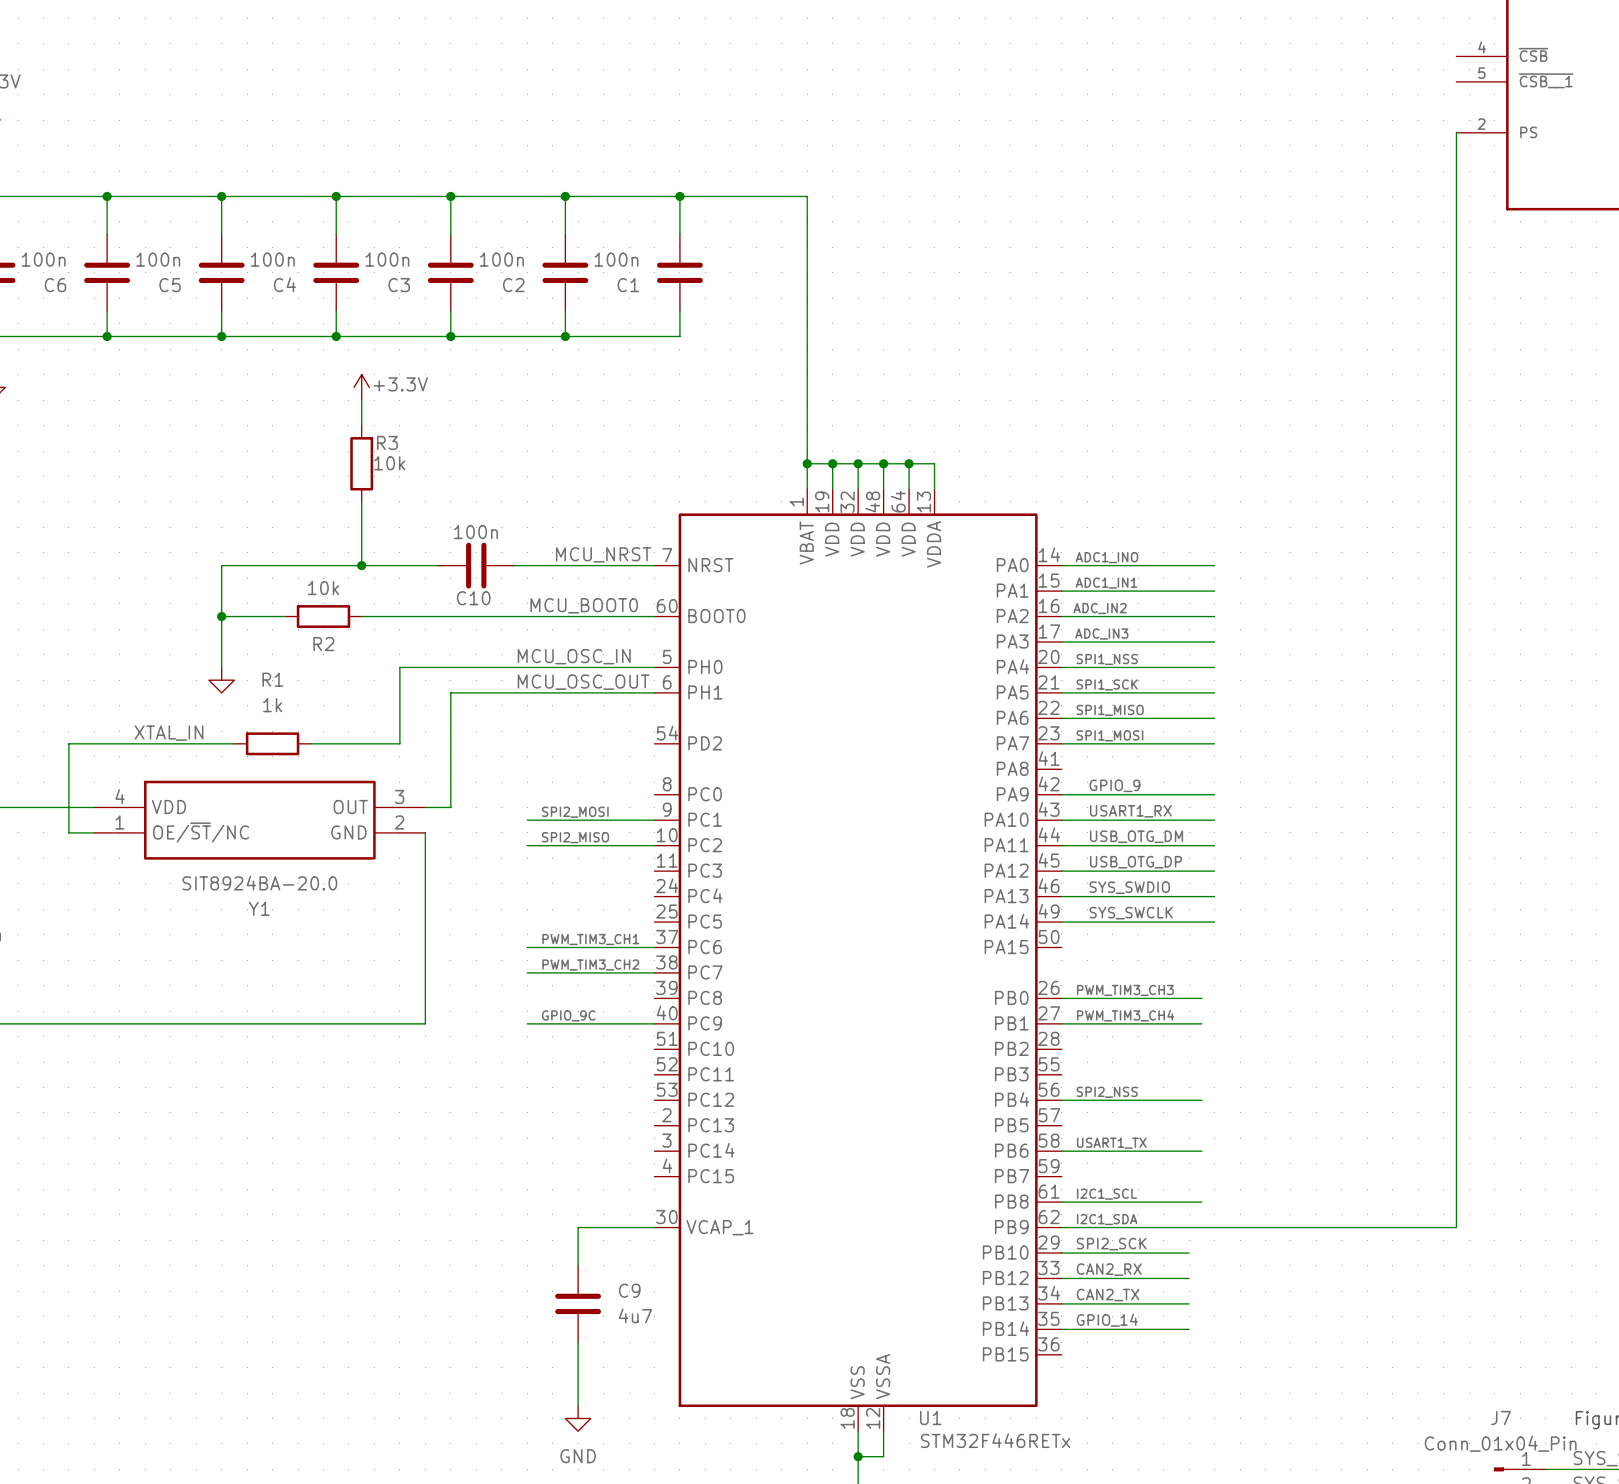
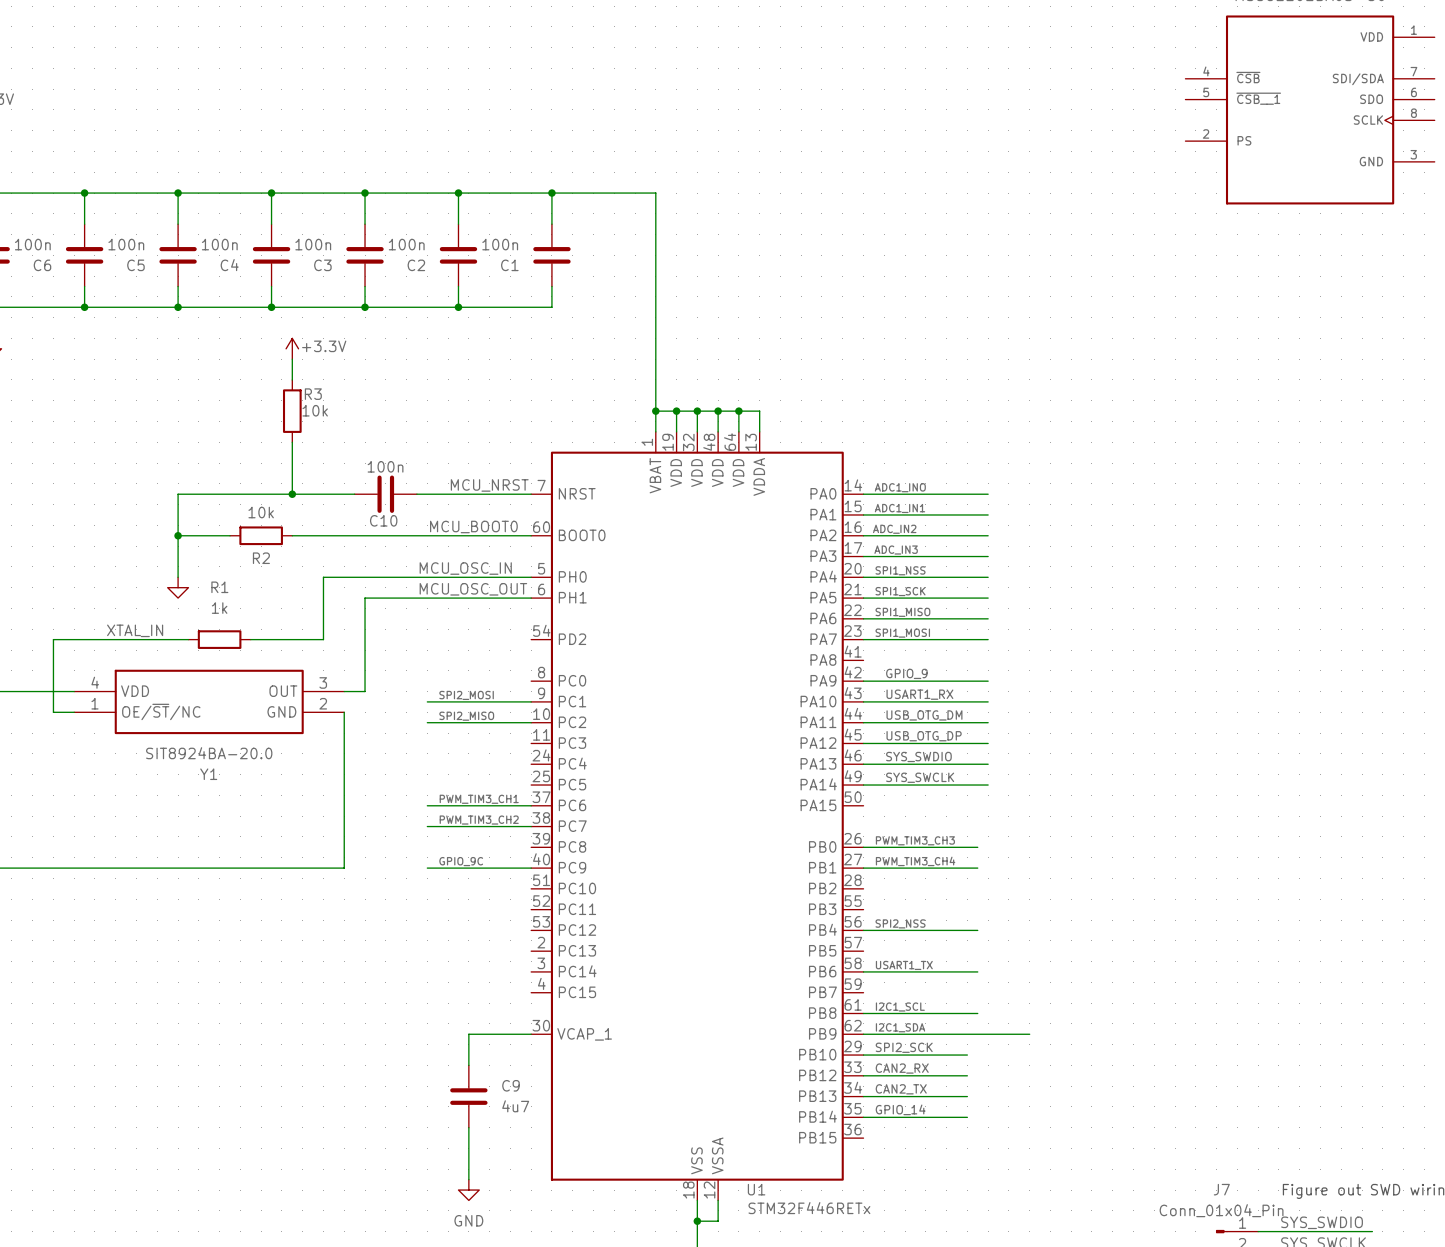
wire: (1456, 132) (1456, 1227) (1265, 1227) -> none

